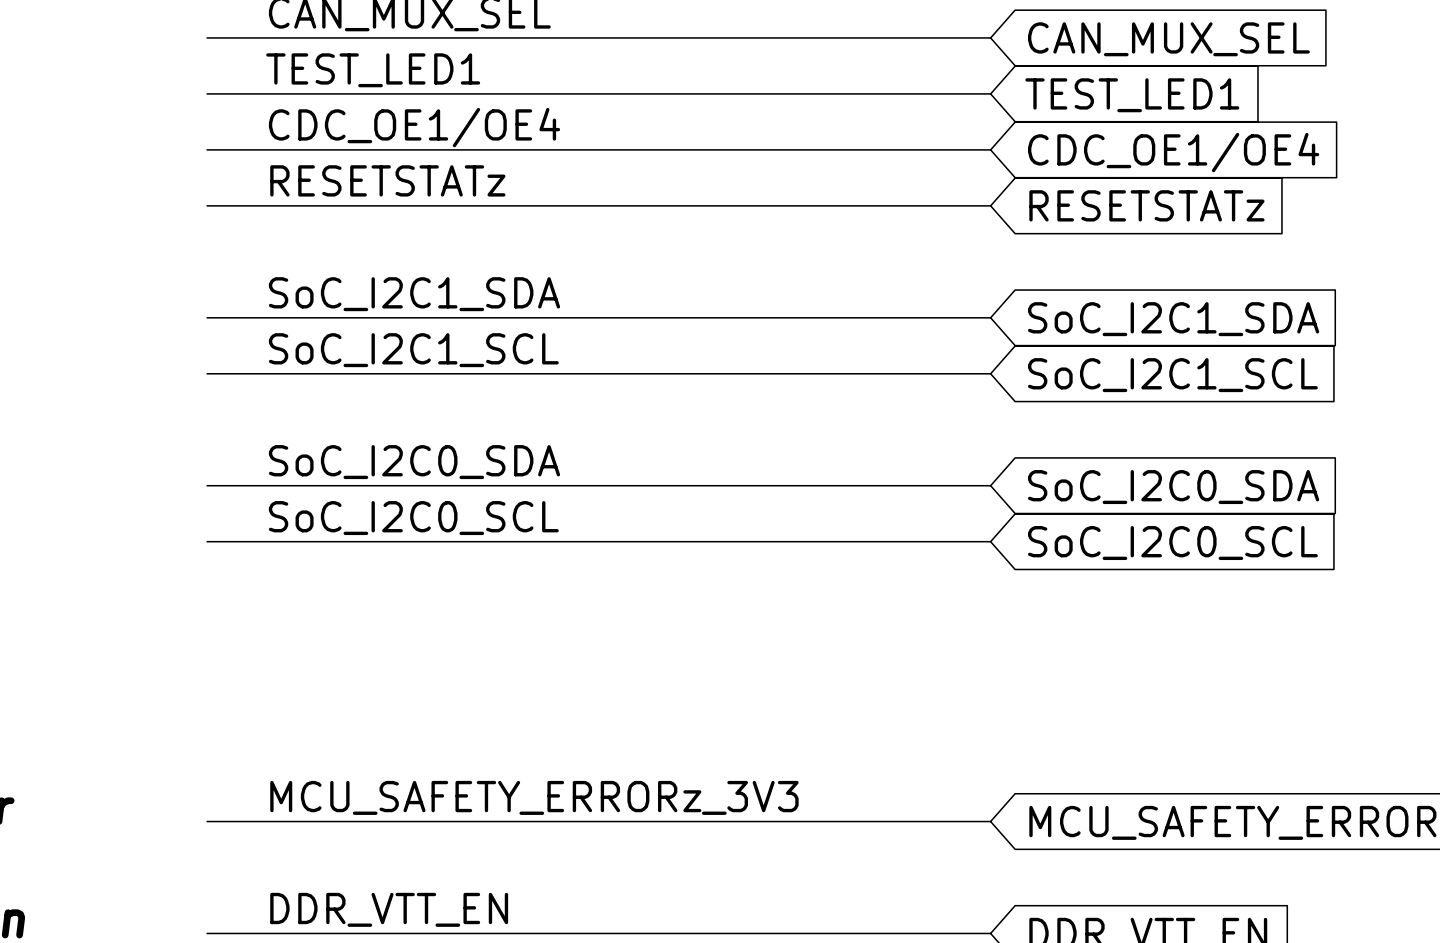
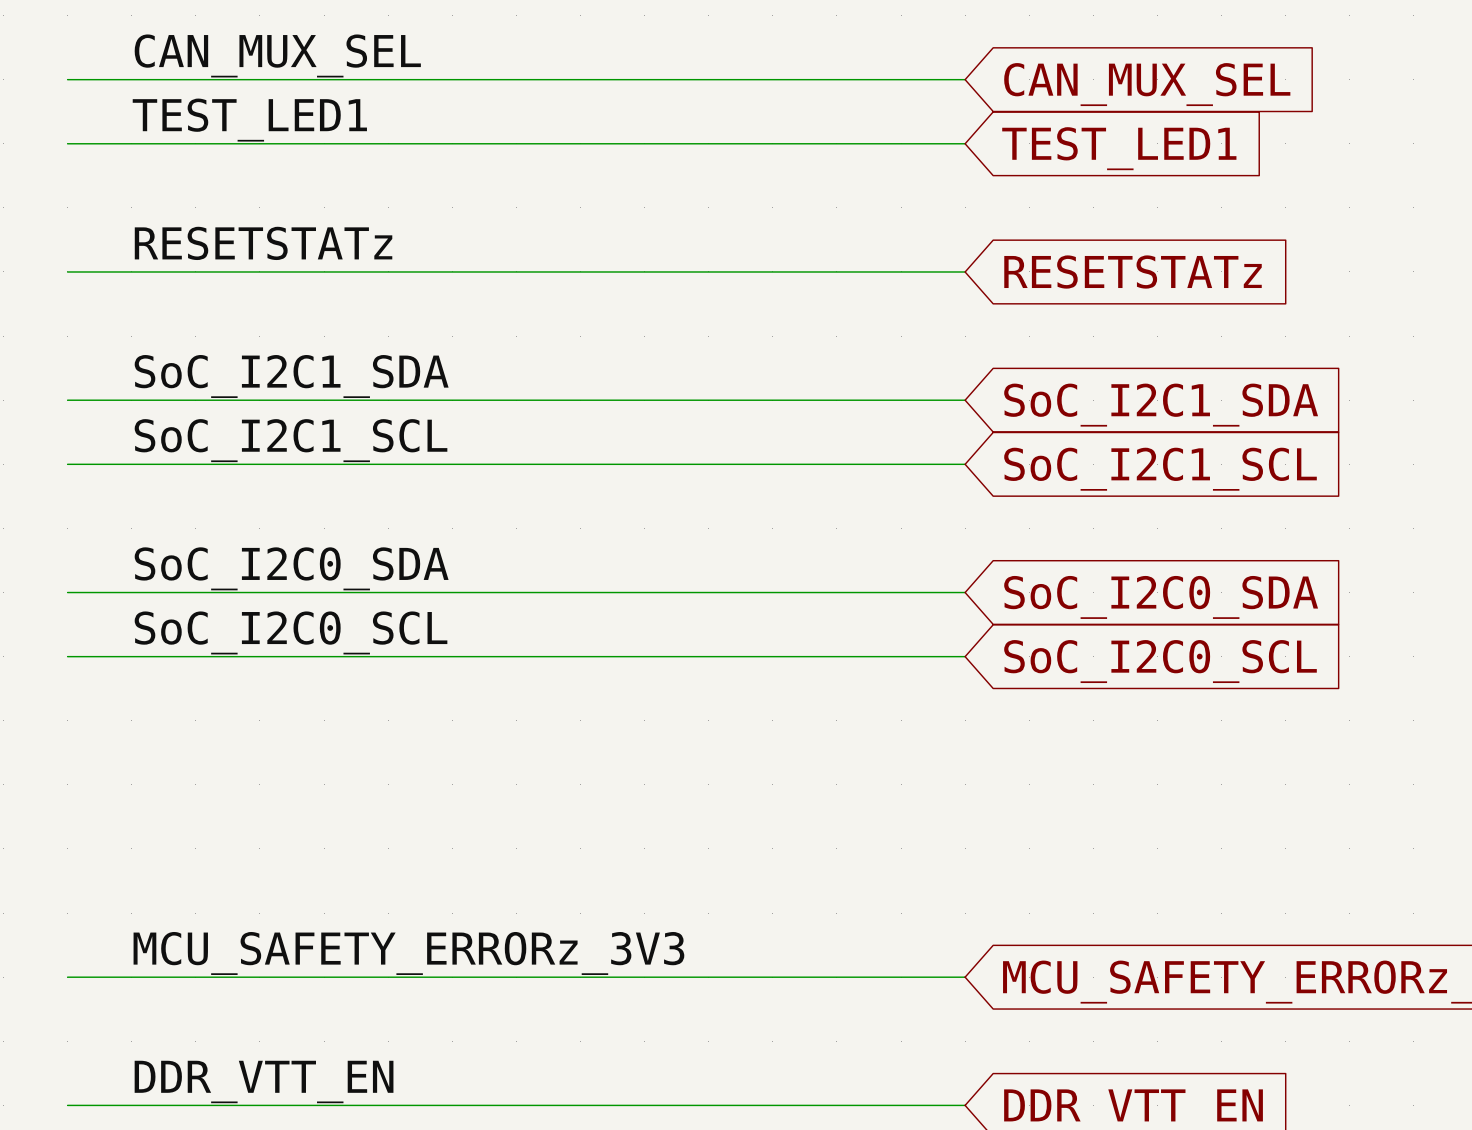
label: CDC_OE1/OE4 (414, 127) -> none
wire: (207, 149) (990, 149) -> none
global label: CDC_OE1/OE4 (1173, 152) -> none

